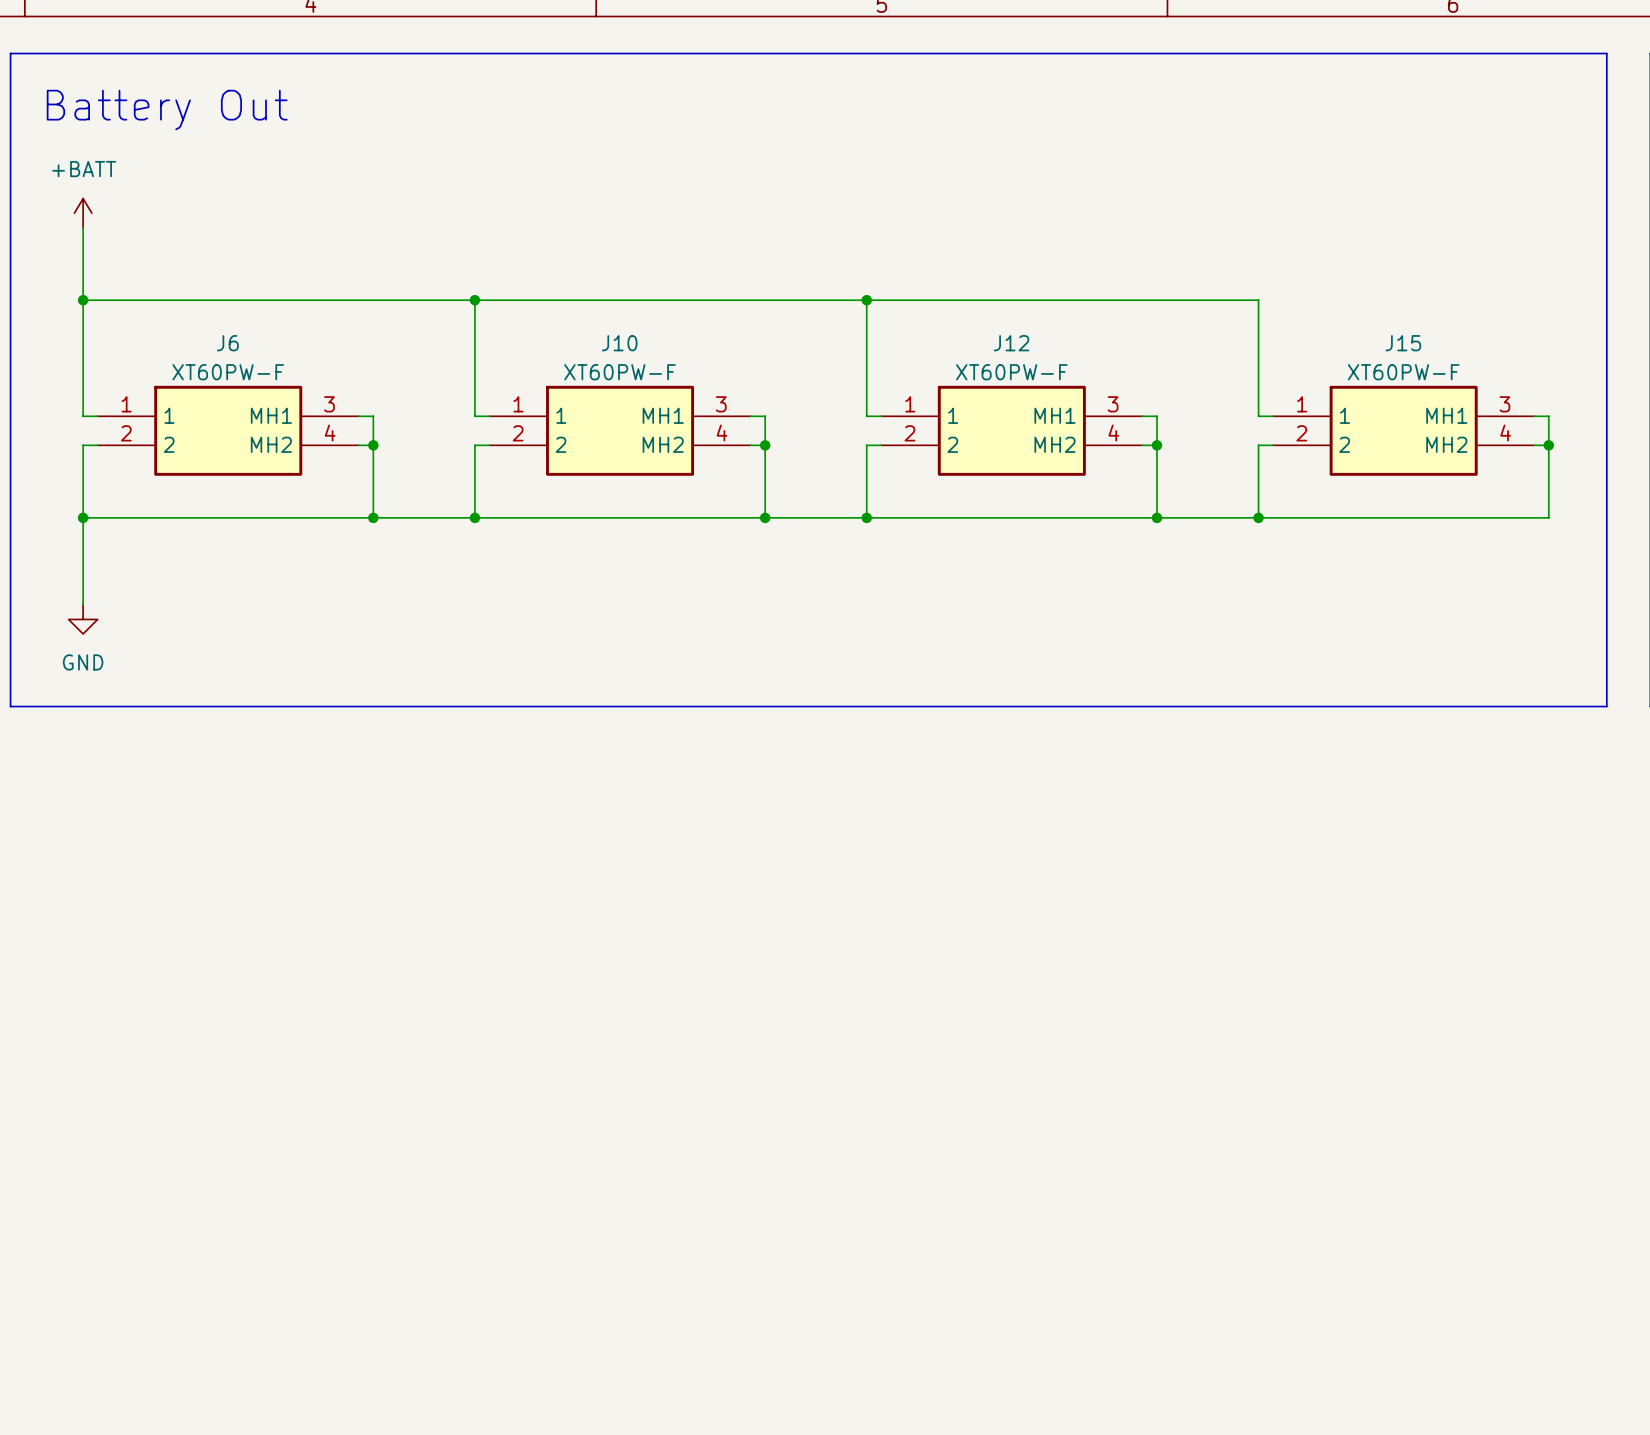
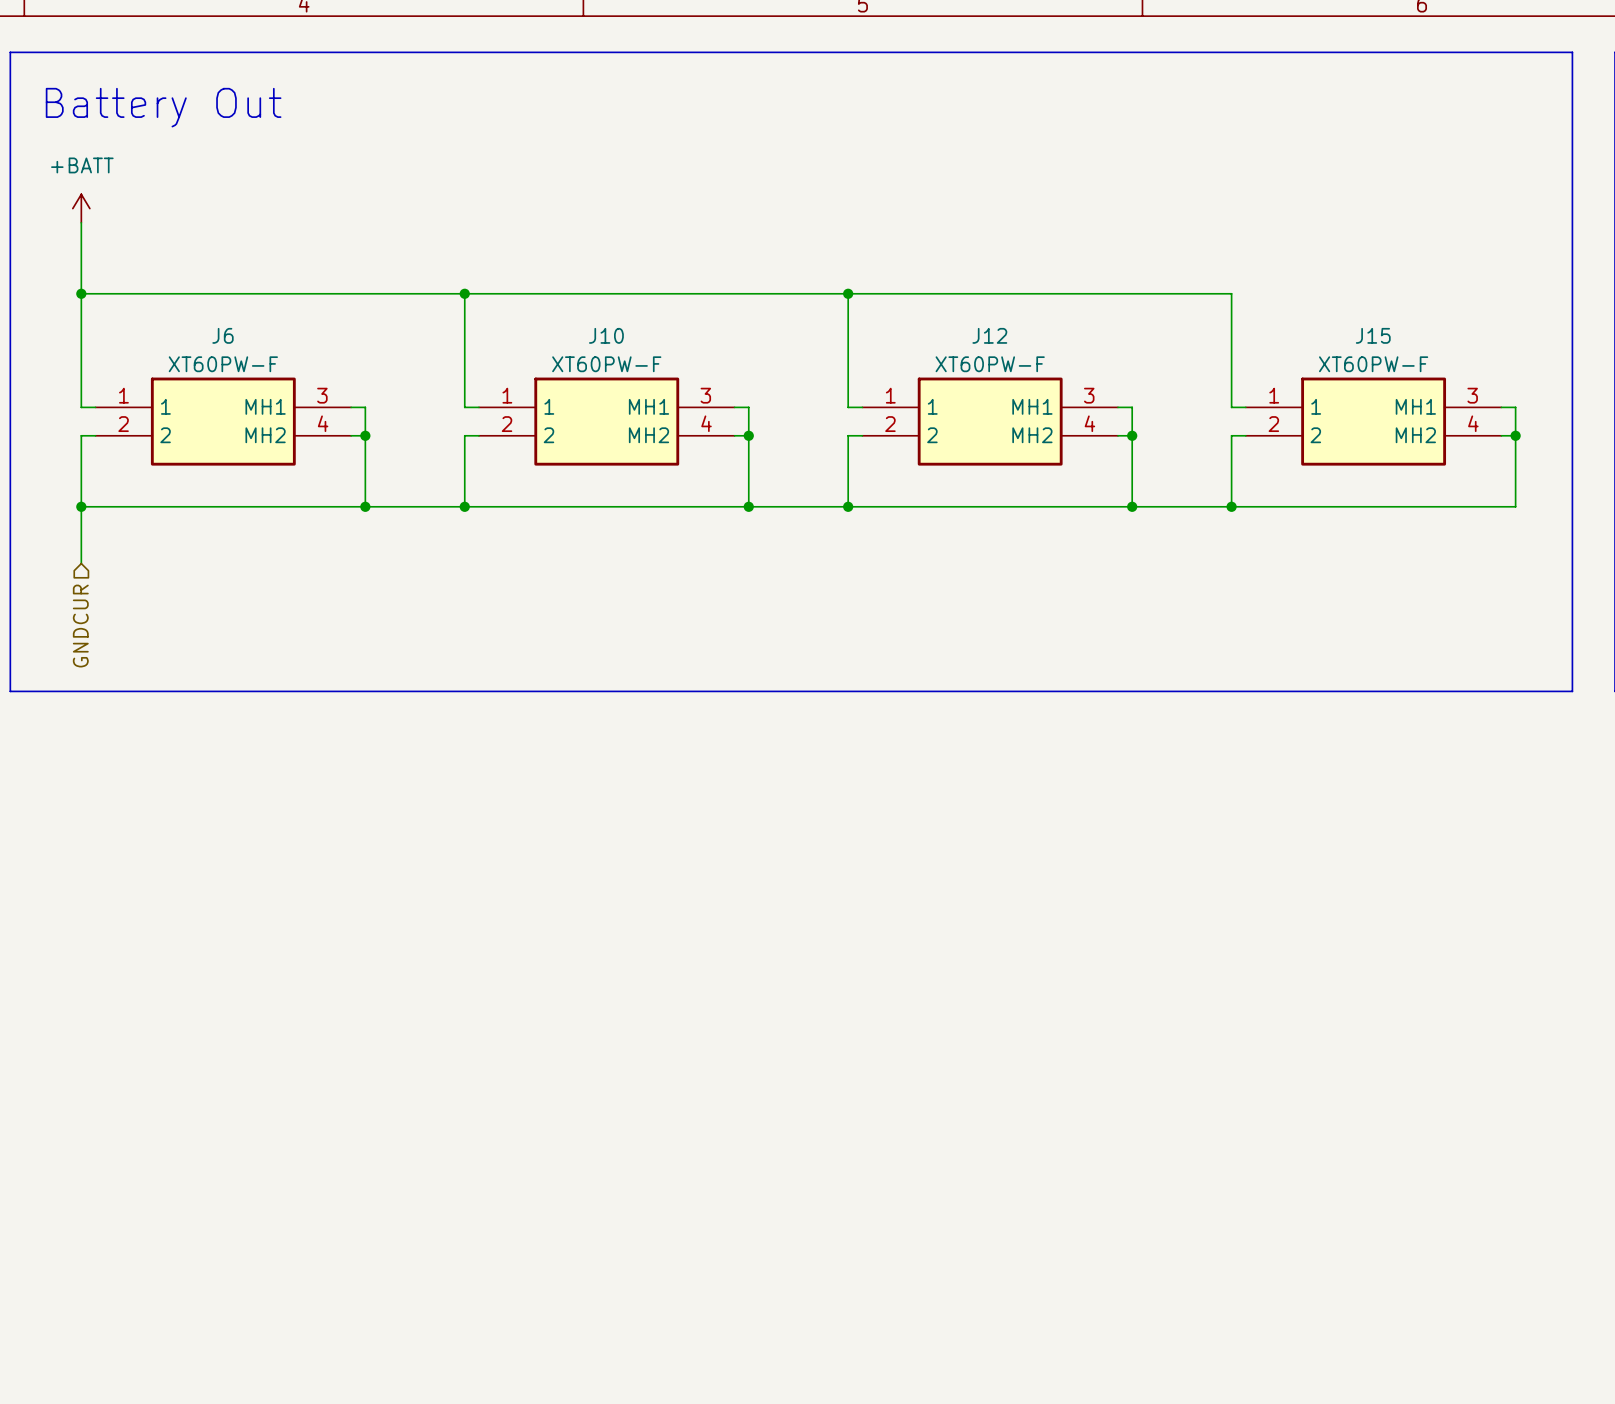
wire: (83, 575) (83, 604) -> none
power symbol: GND (83, 619) -> none
hierarchical label: none -> GNDCUR (80, 626)

